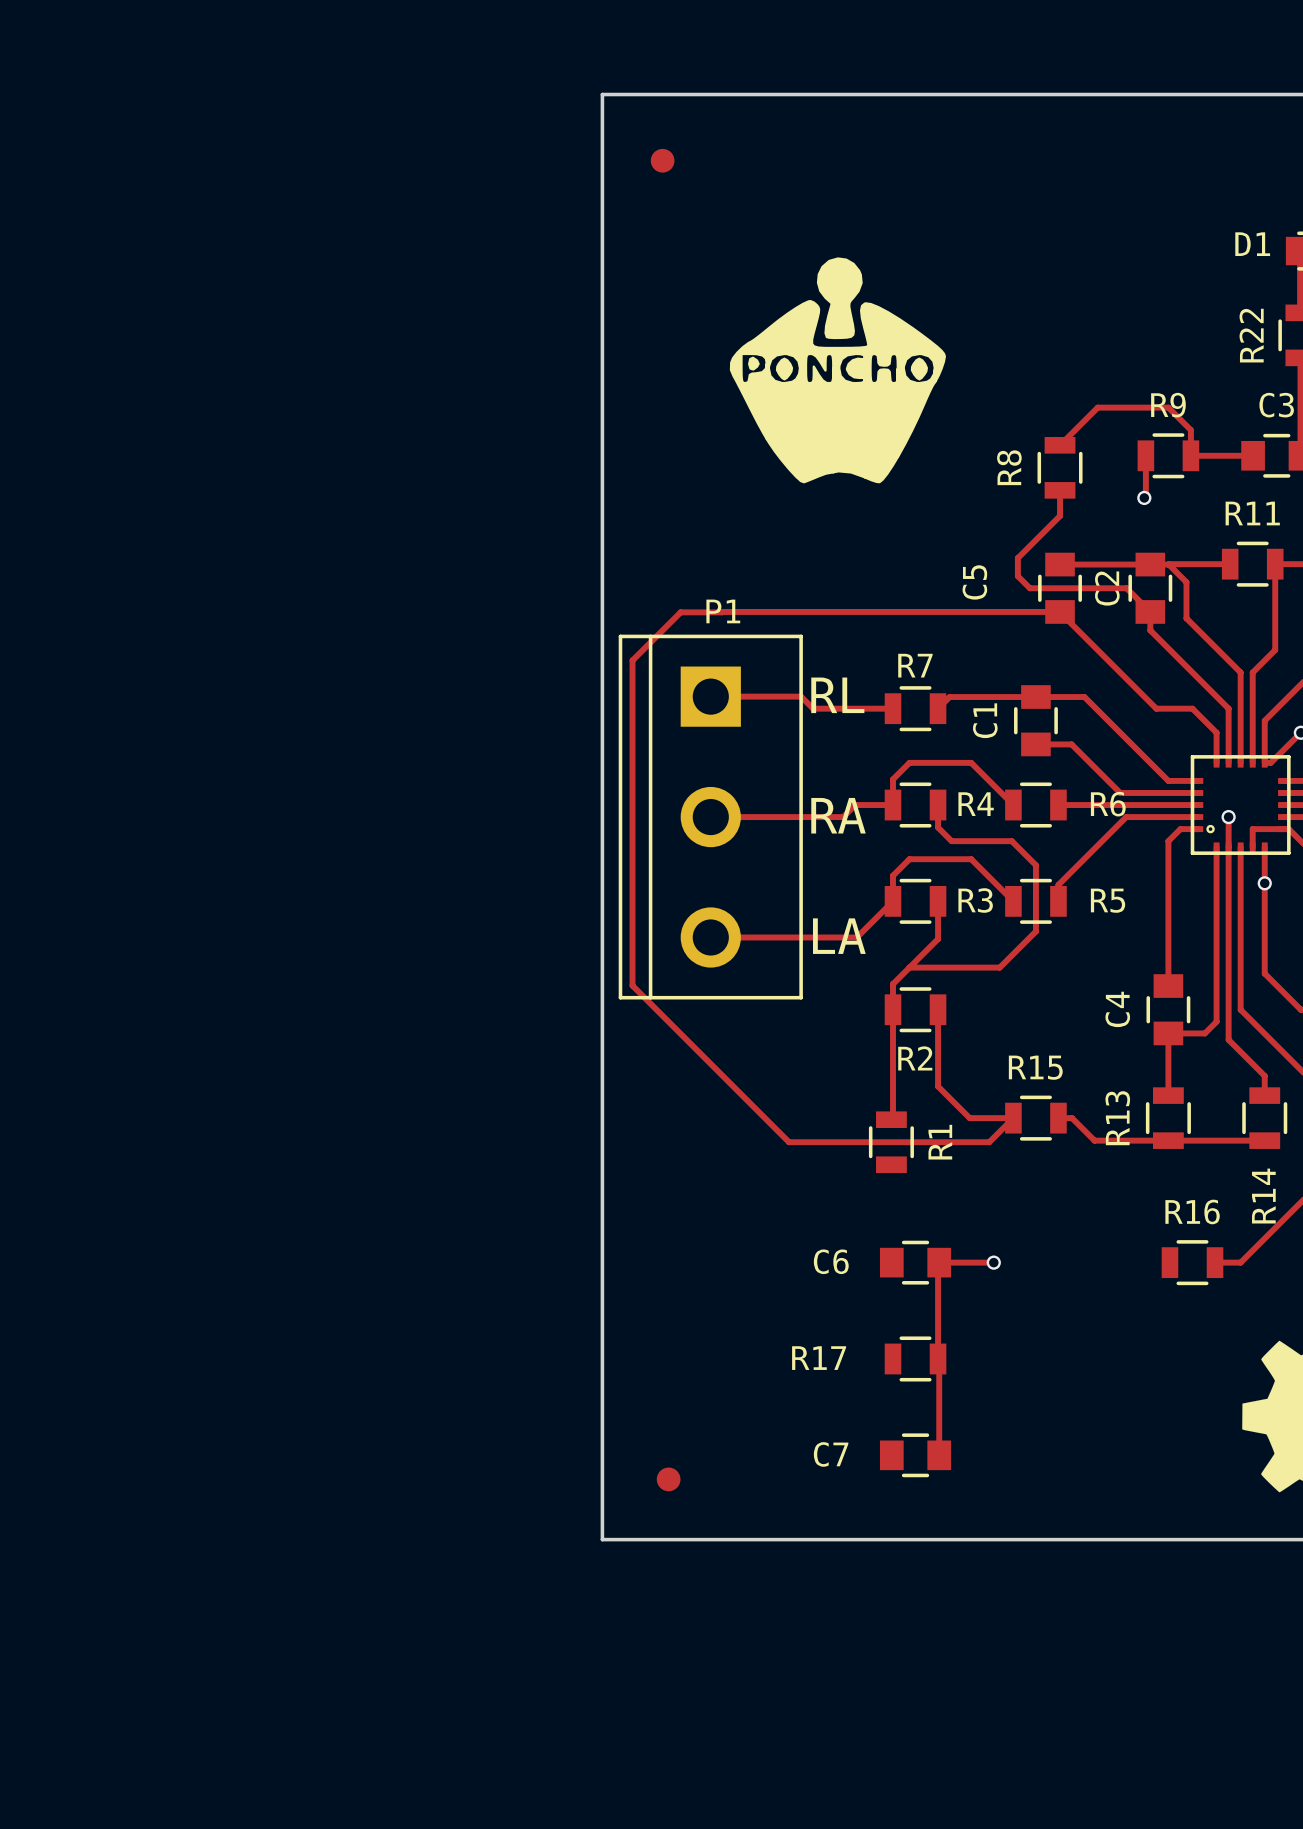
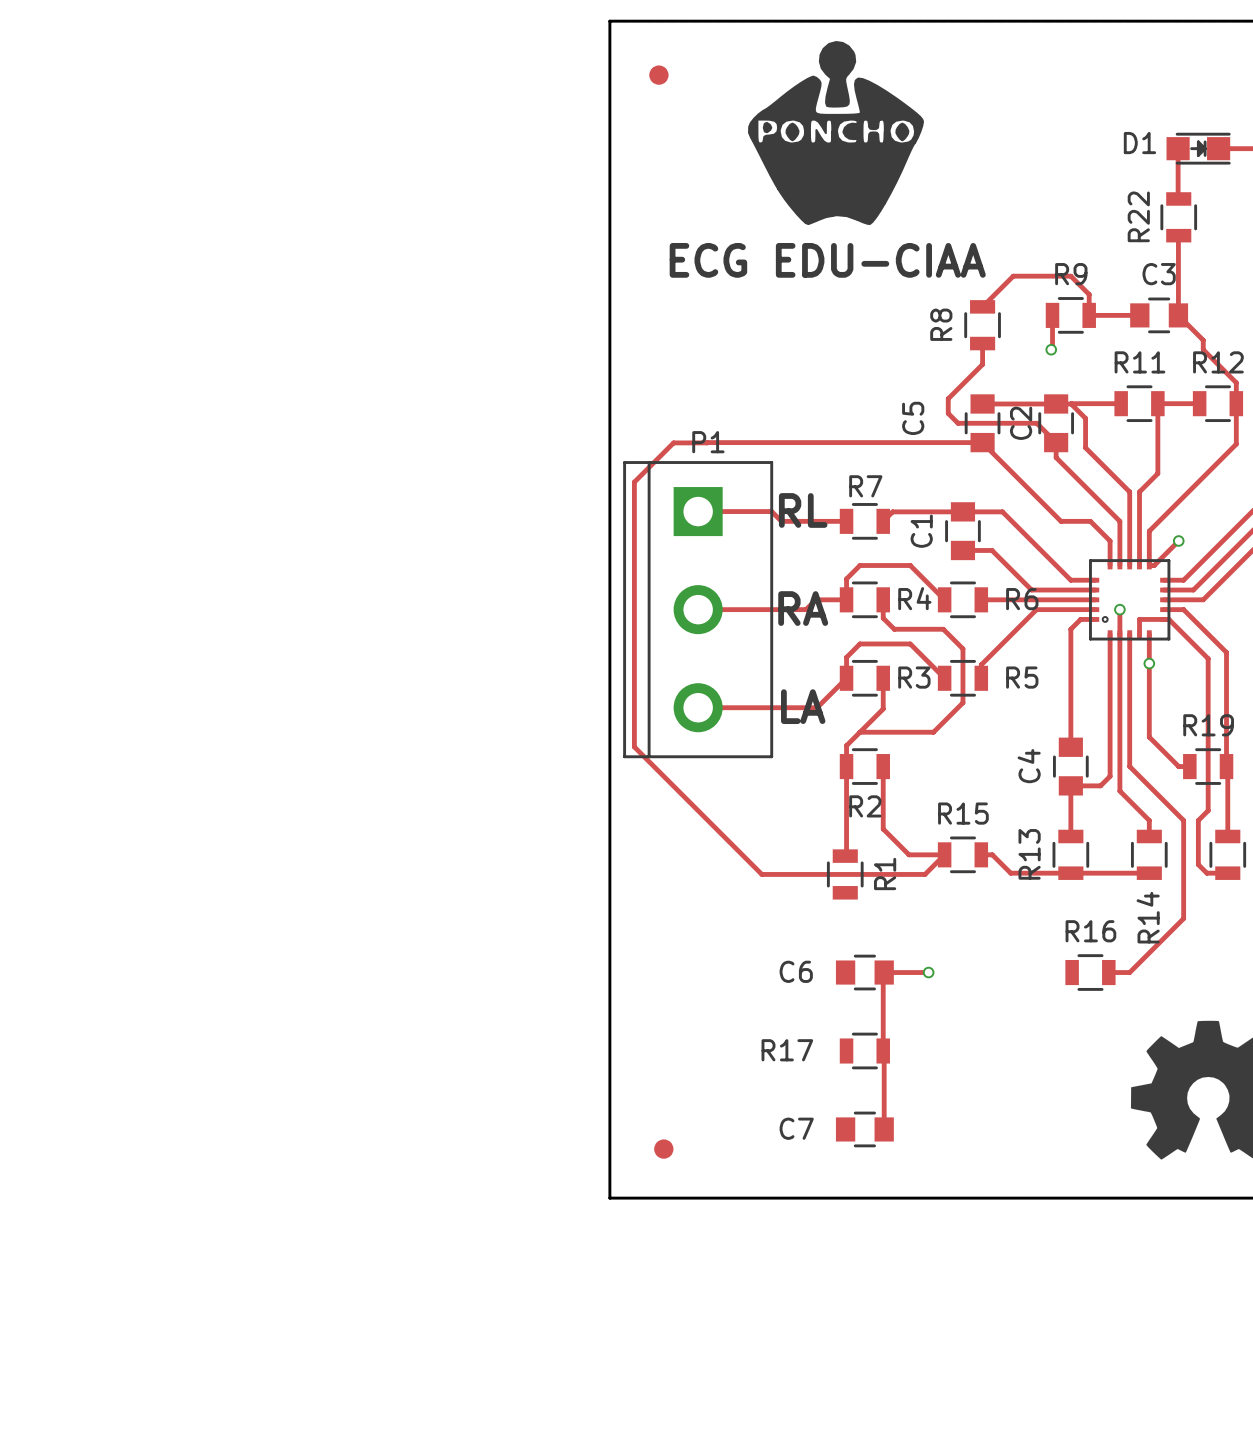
drawing position: (837, 370) -> (836, 133)
text: none -> ECG EDU-CIAA (827, 260)

